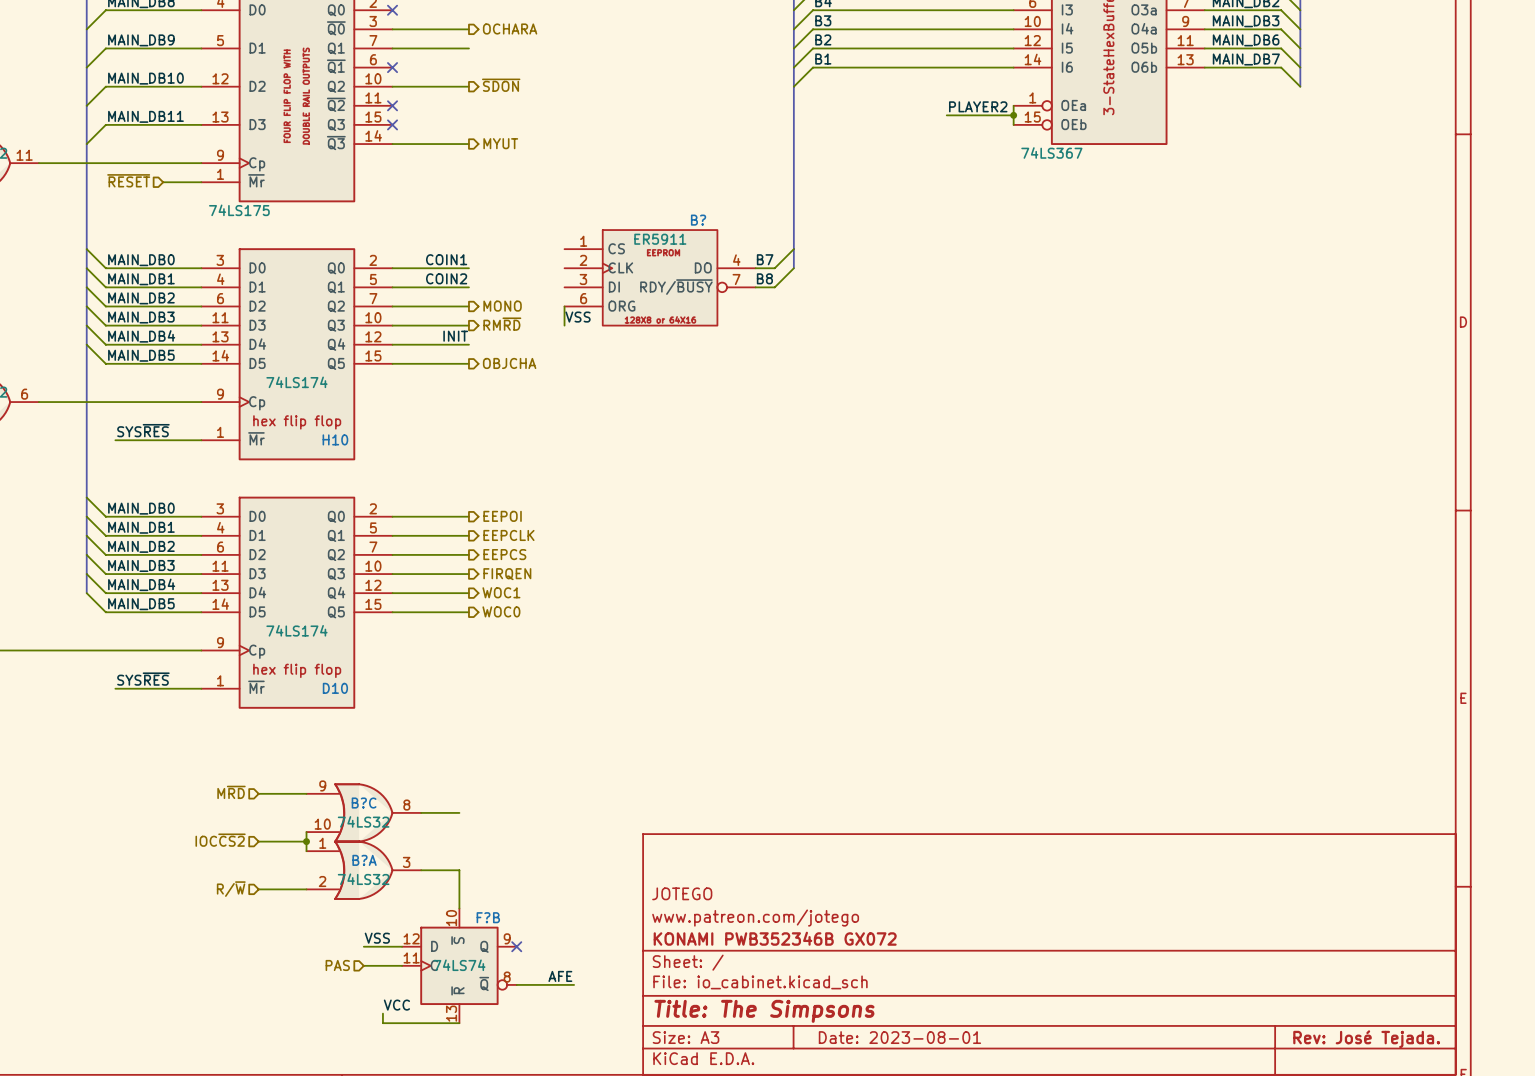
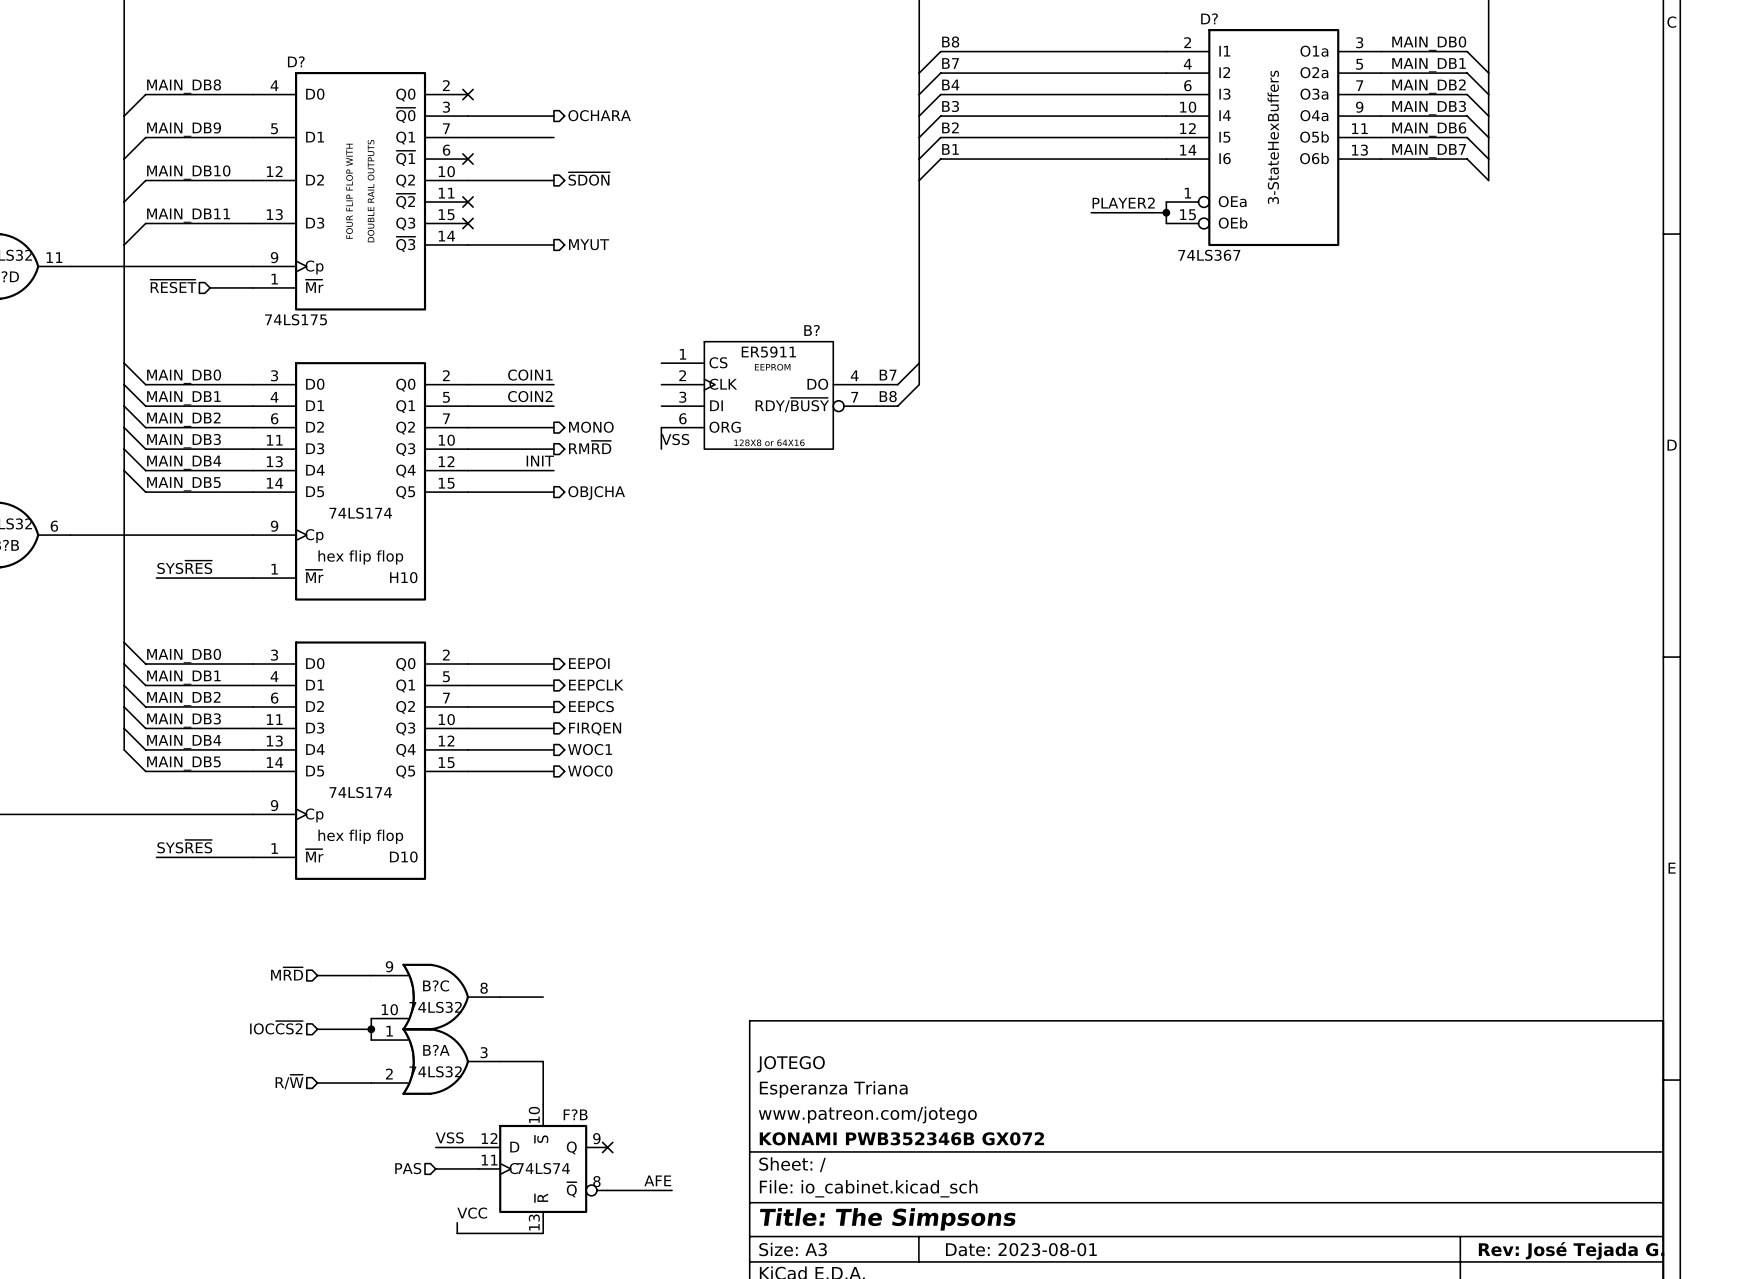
title block: none -> JOTEGO (791, 1064)
title block: JOTEGO (682, 893) -> Esperanza Triana (833, 1089)
title block: Rev: José Tejada. (1366, 1039) -> Rev: José Tejada G. (1571, 1250)

